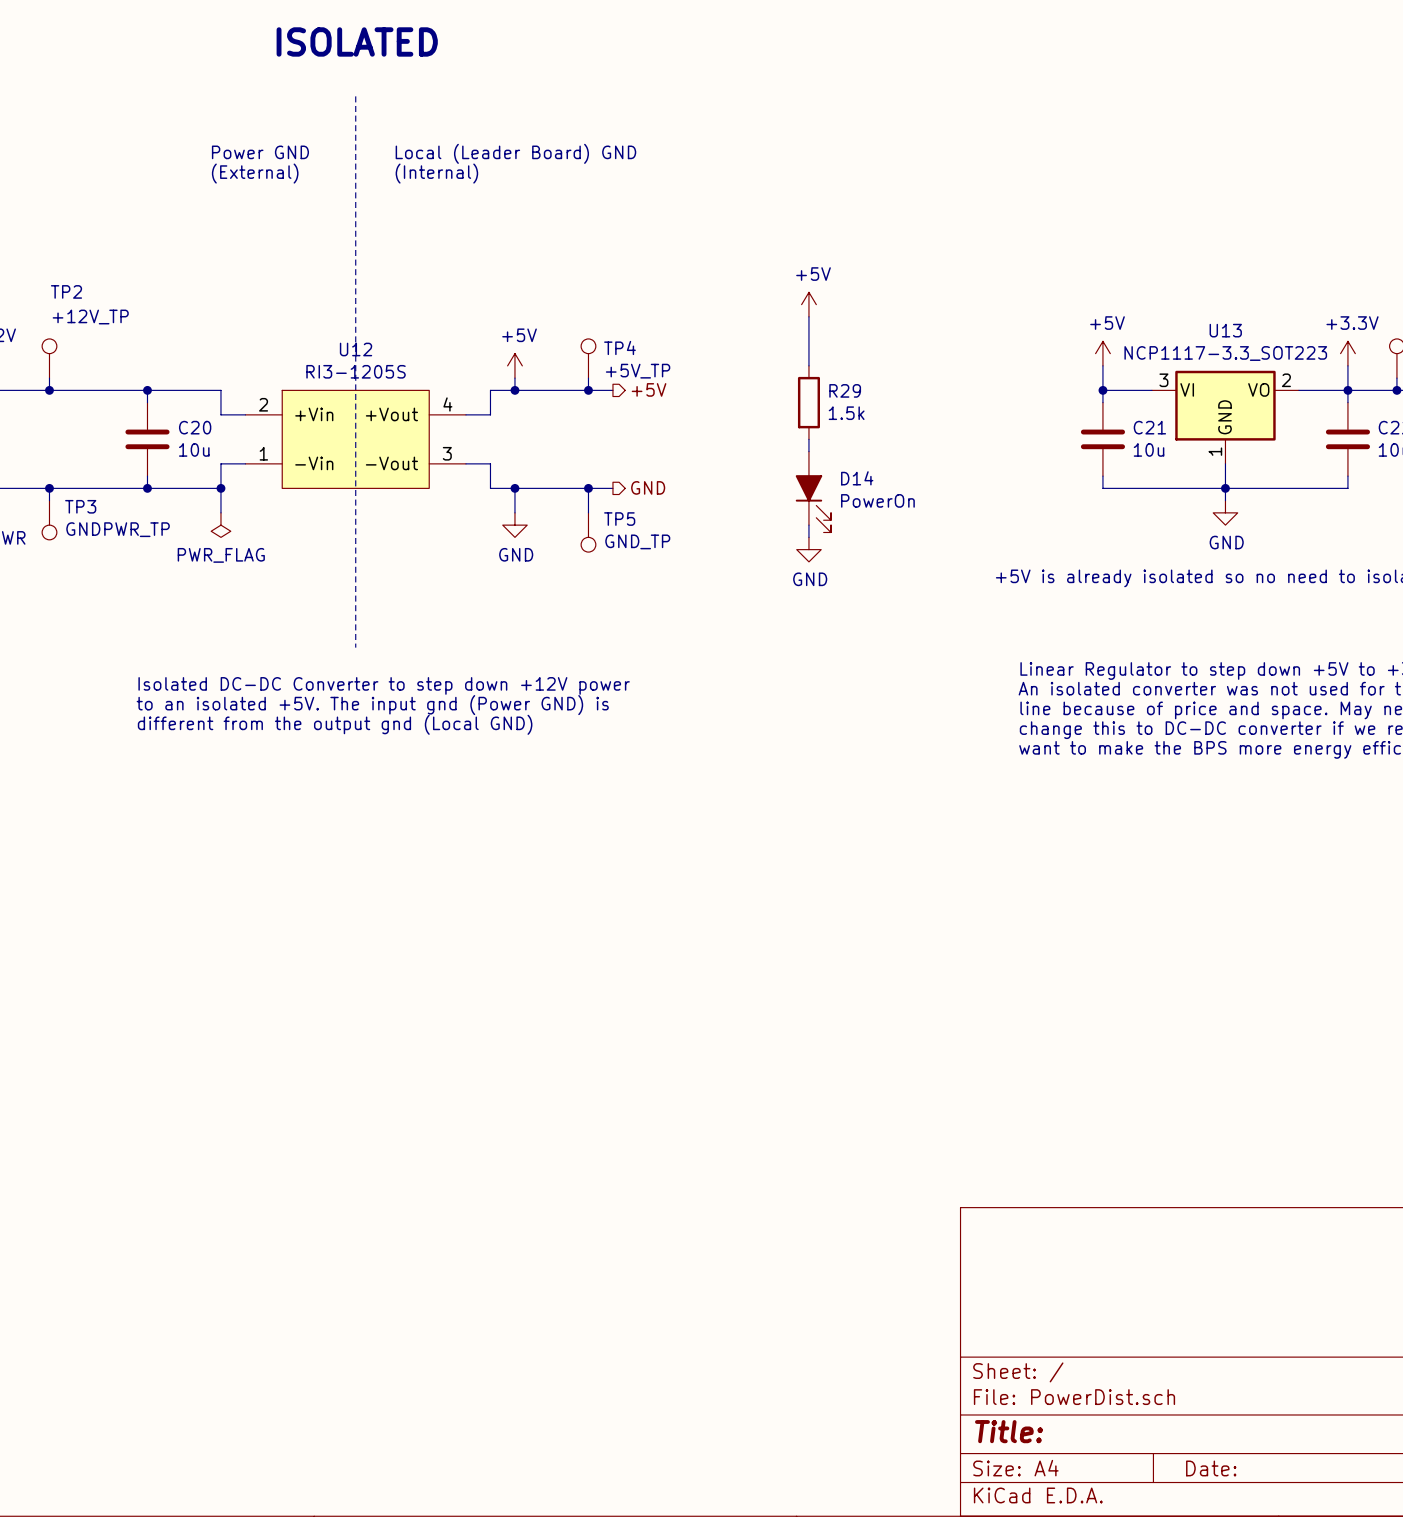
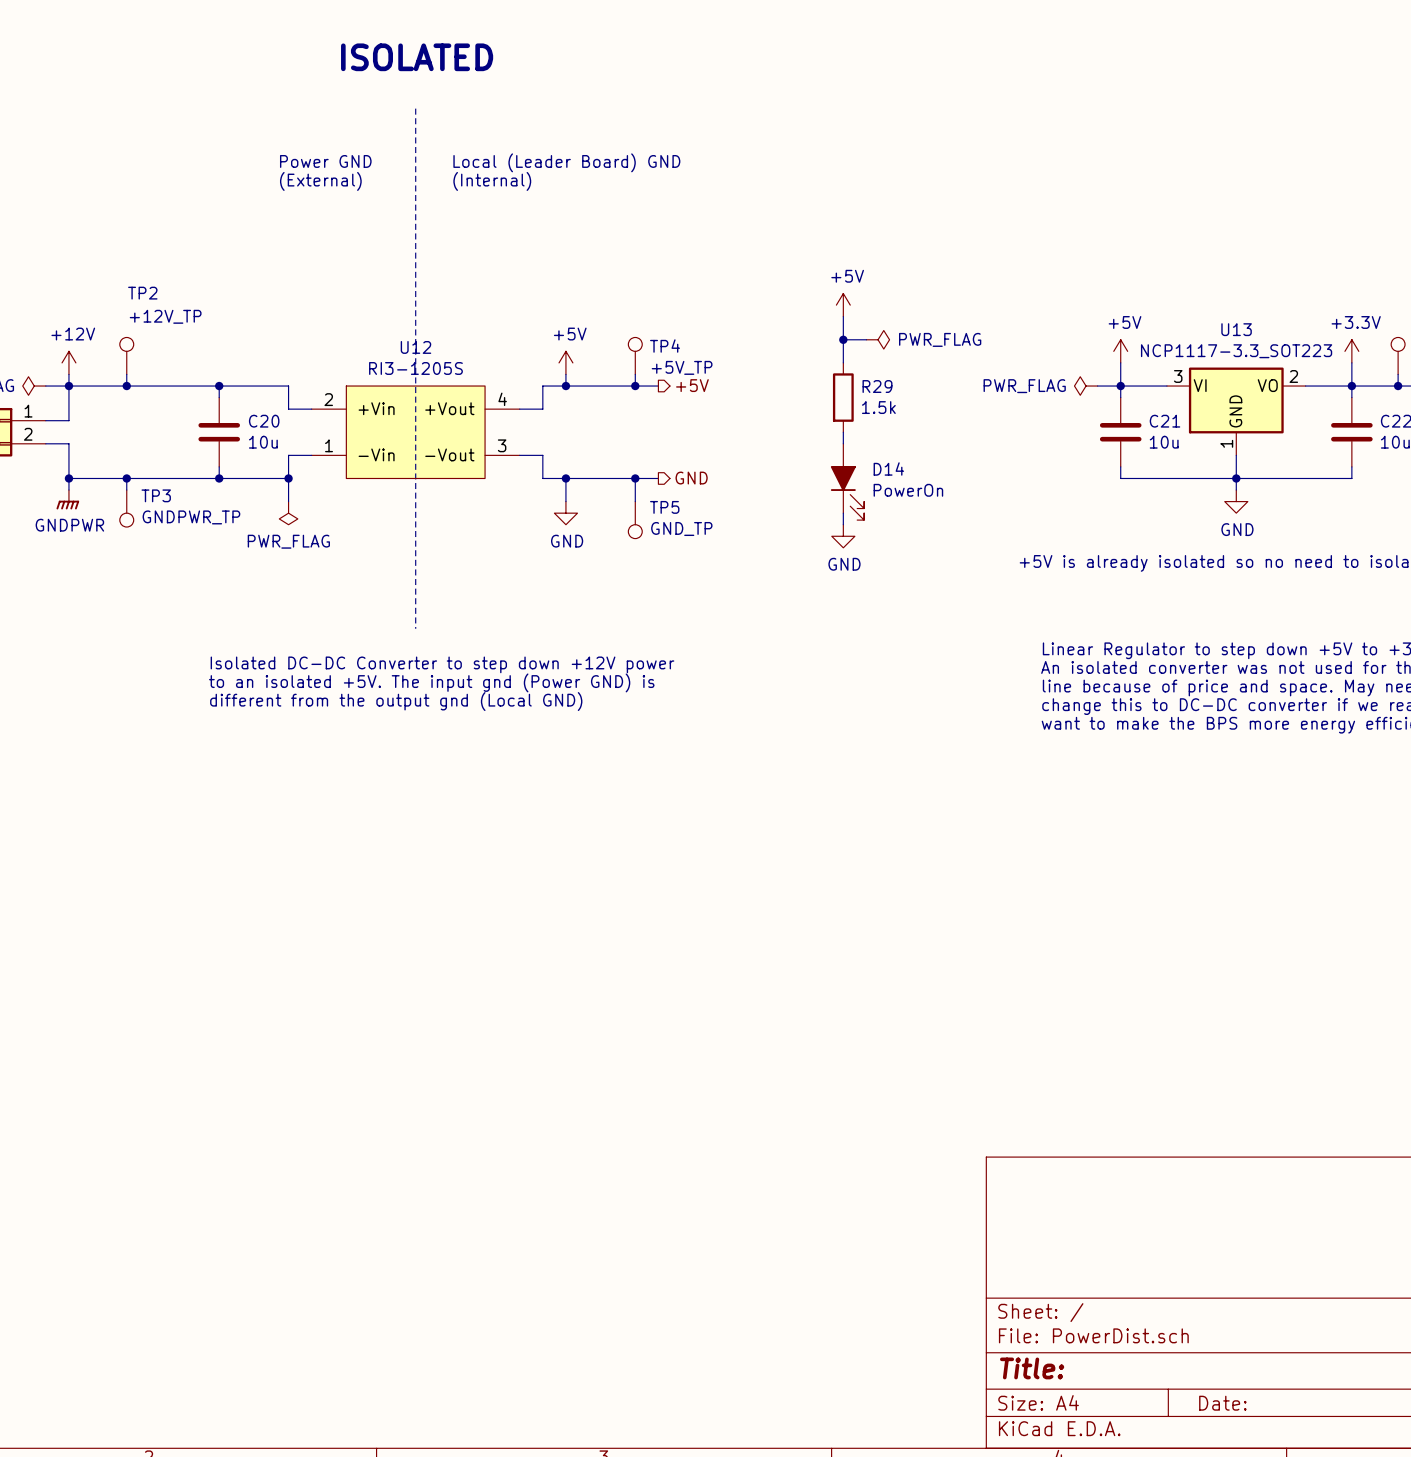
wire: none -> (843, 339) (866, 339)
junction: none -> (843, 339)
power symbol: none -> PWR_FLAG (878, 339)
power symbol: none -> PWR_FLAG (1086, 386)
wire: none -> (1097, 386) (1120, 386)

